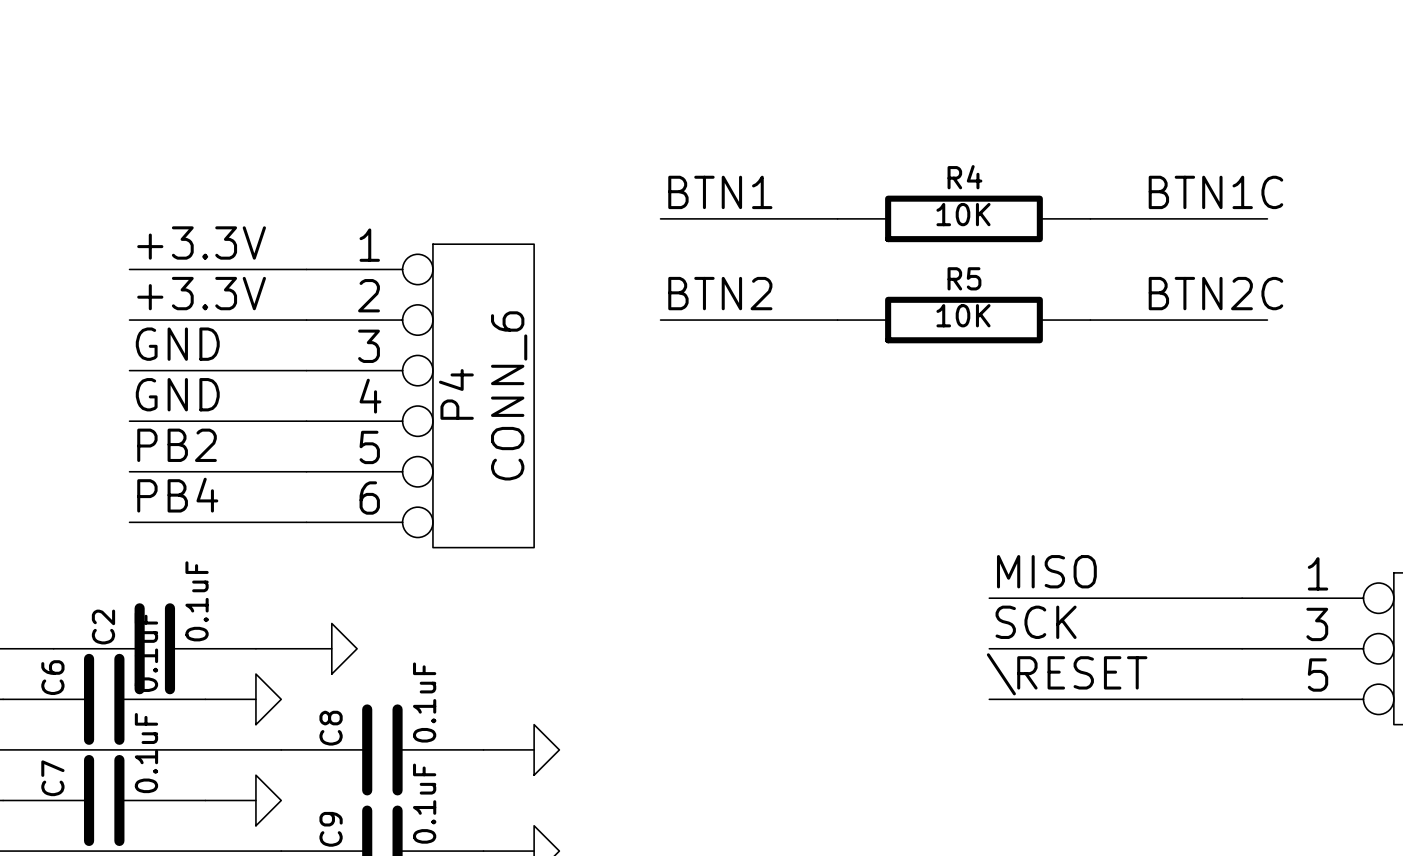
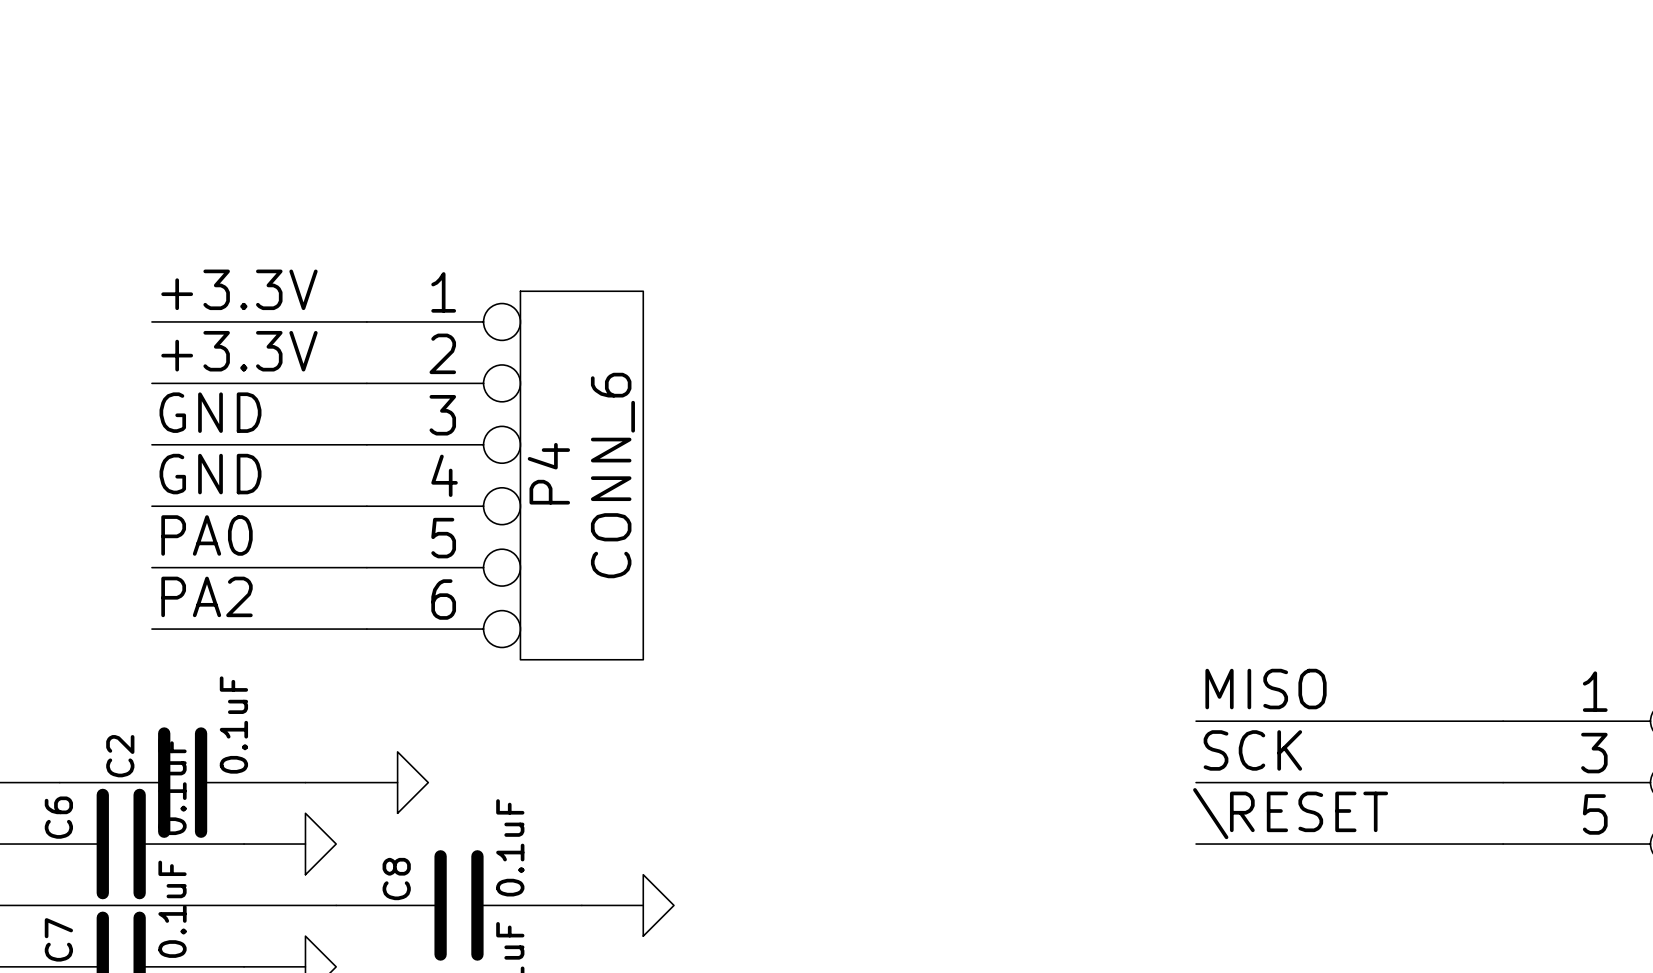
label: BTN1 (720, 192) -> none
label: BTN1C (1215, 192) -> none
wire: (660, 218) (837, 218) -> none
R4: 10K (963, 218) -> none
wire: (1090, 218) (1267, 218) -> none
label: BTN2 (720, 293) -> none
label: BTN2C (1215, 293) -> none
wire: (660, 320) (837, 320) -> none
R5: 10K (963, 320) -> none
wire: (1090, 320) (1267, 320) -> none
label: PB2 (177, 445) -> PA0 (206, 535)
label: PB4 (177, 495) -> PA2 (206, 596)

